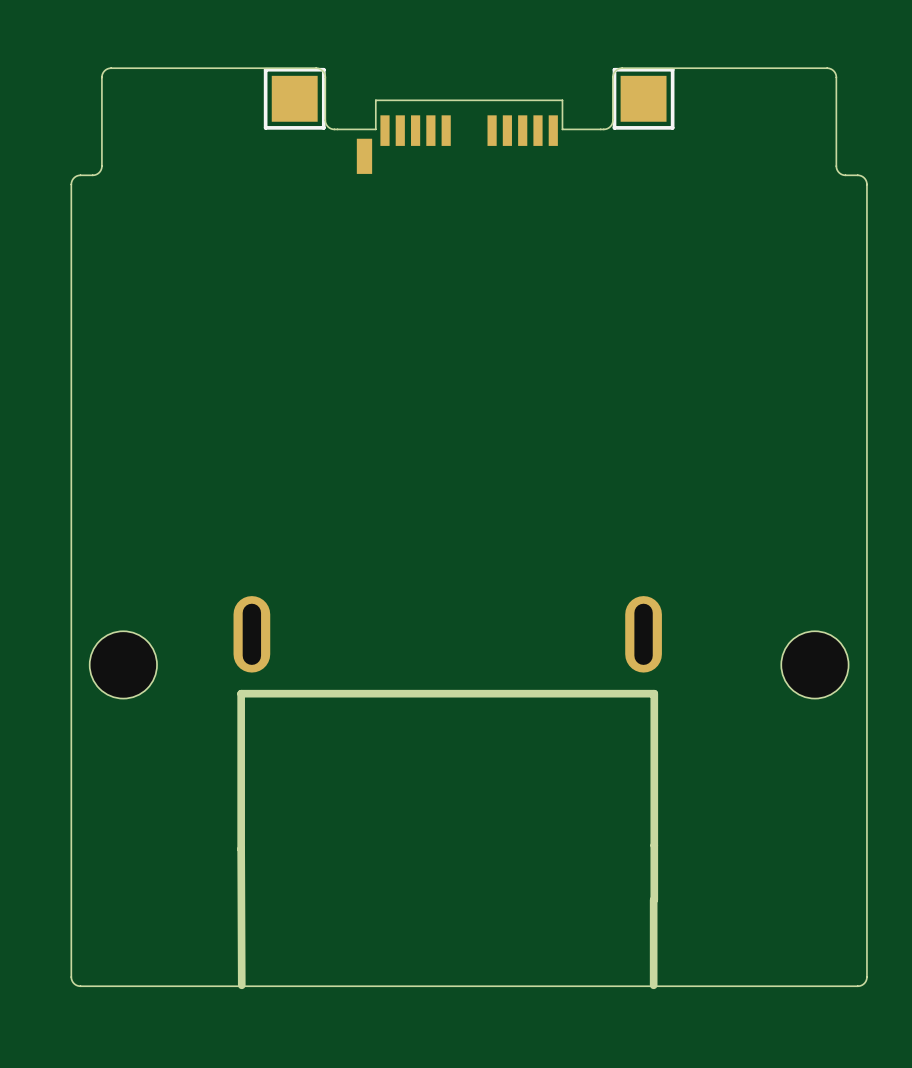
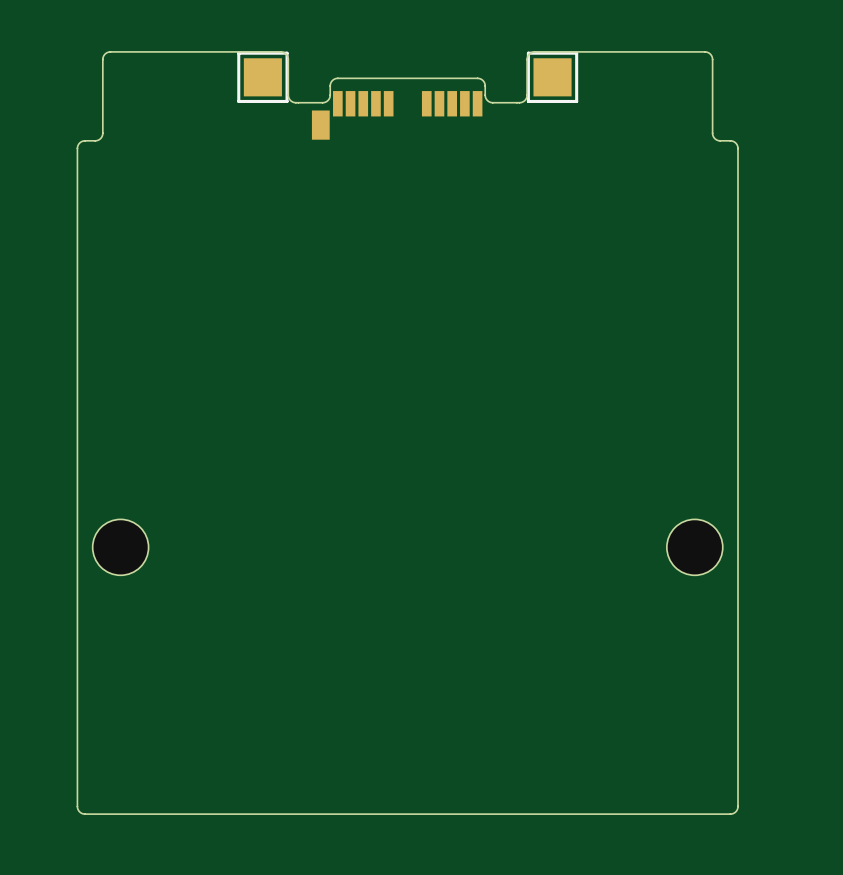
part footprint: [356, 99, 564, 174] -> [297, 77, 518, 140]
board edge: (375, 129) (337, 129) -> none
board edge: (600, 129) (562, 129) -> none
part: (447, 792) -> none

